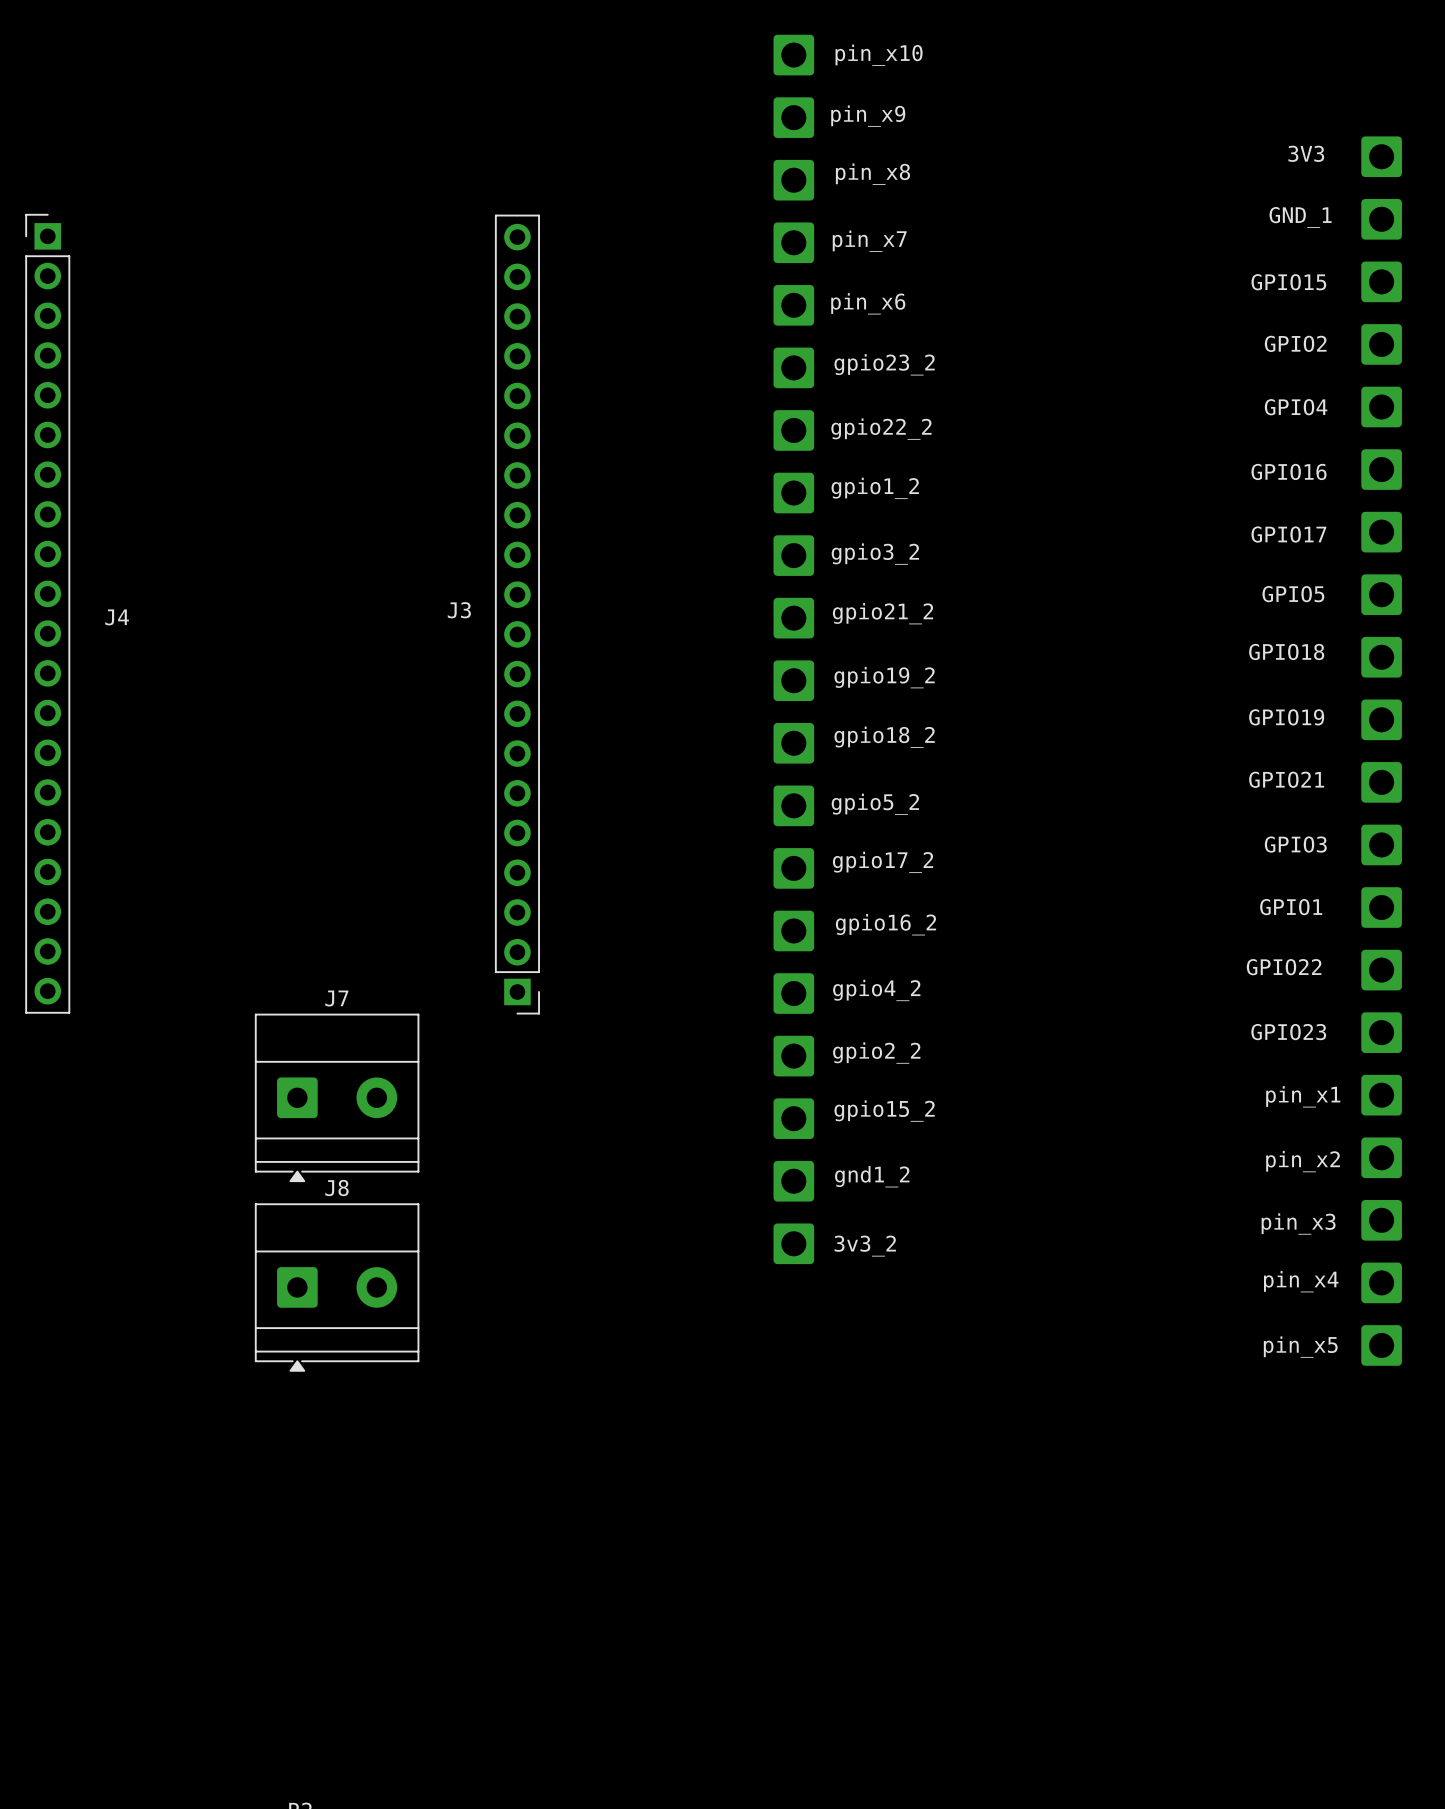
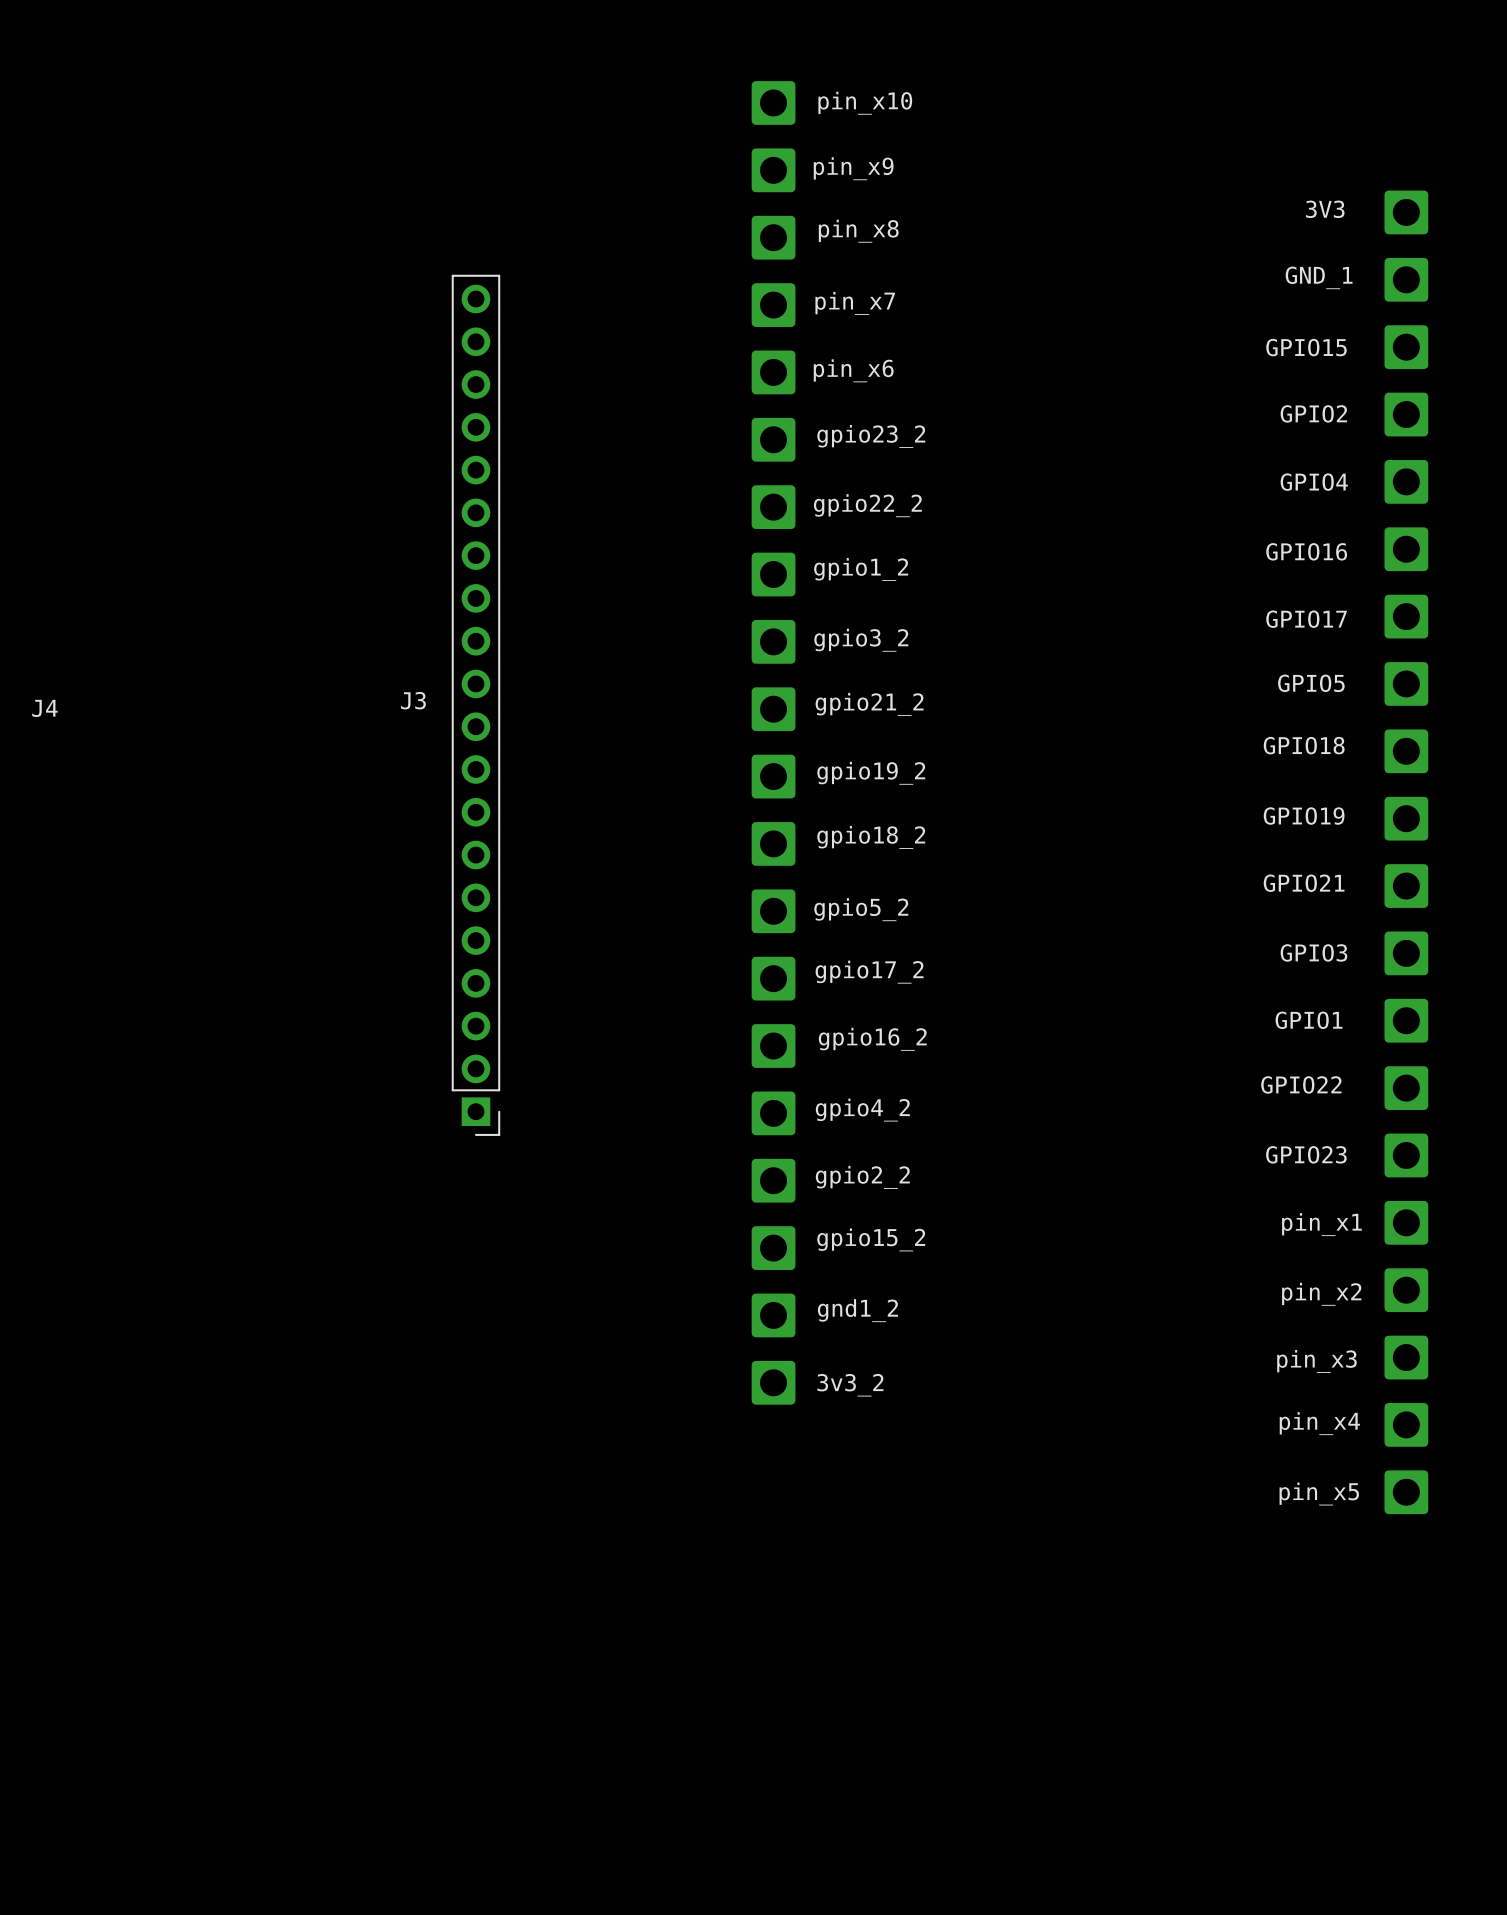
J7: (337, 1097) -> none
J8: (337, 1287) -> none

